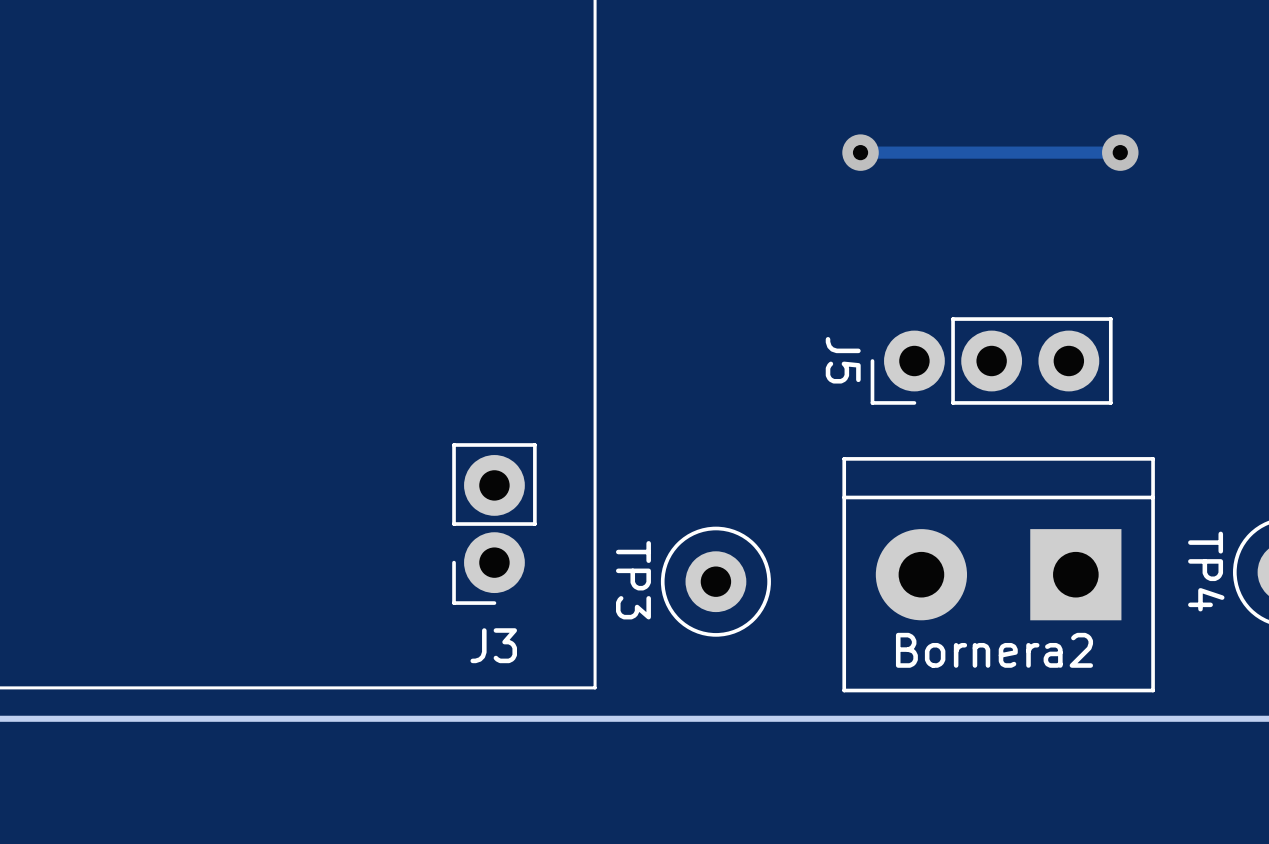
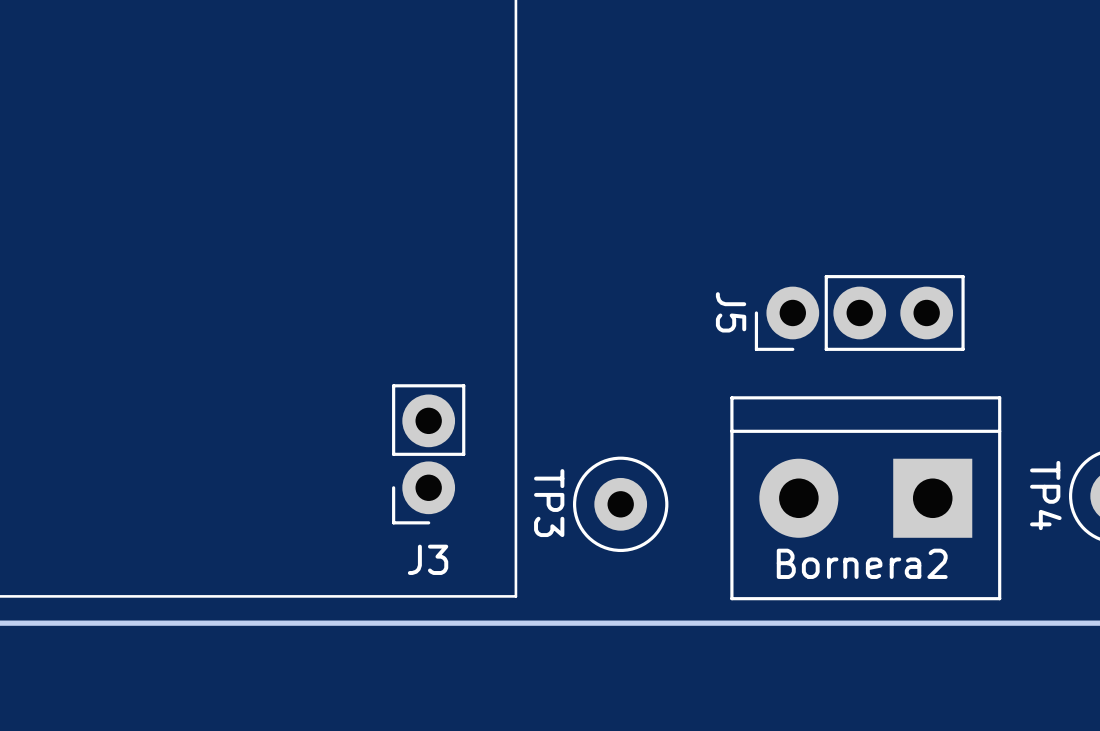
via: (860, 152) -> none
track: (1120, 152) (860, 152) -> none
via: (1120, 152) -> none

